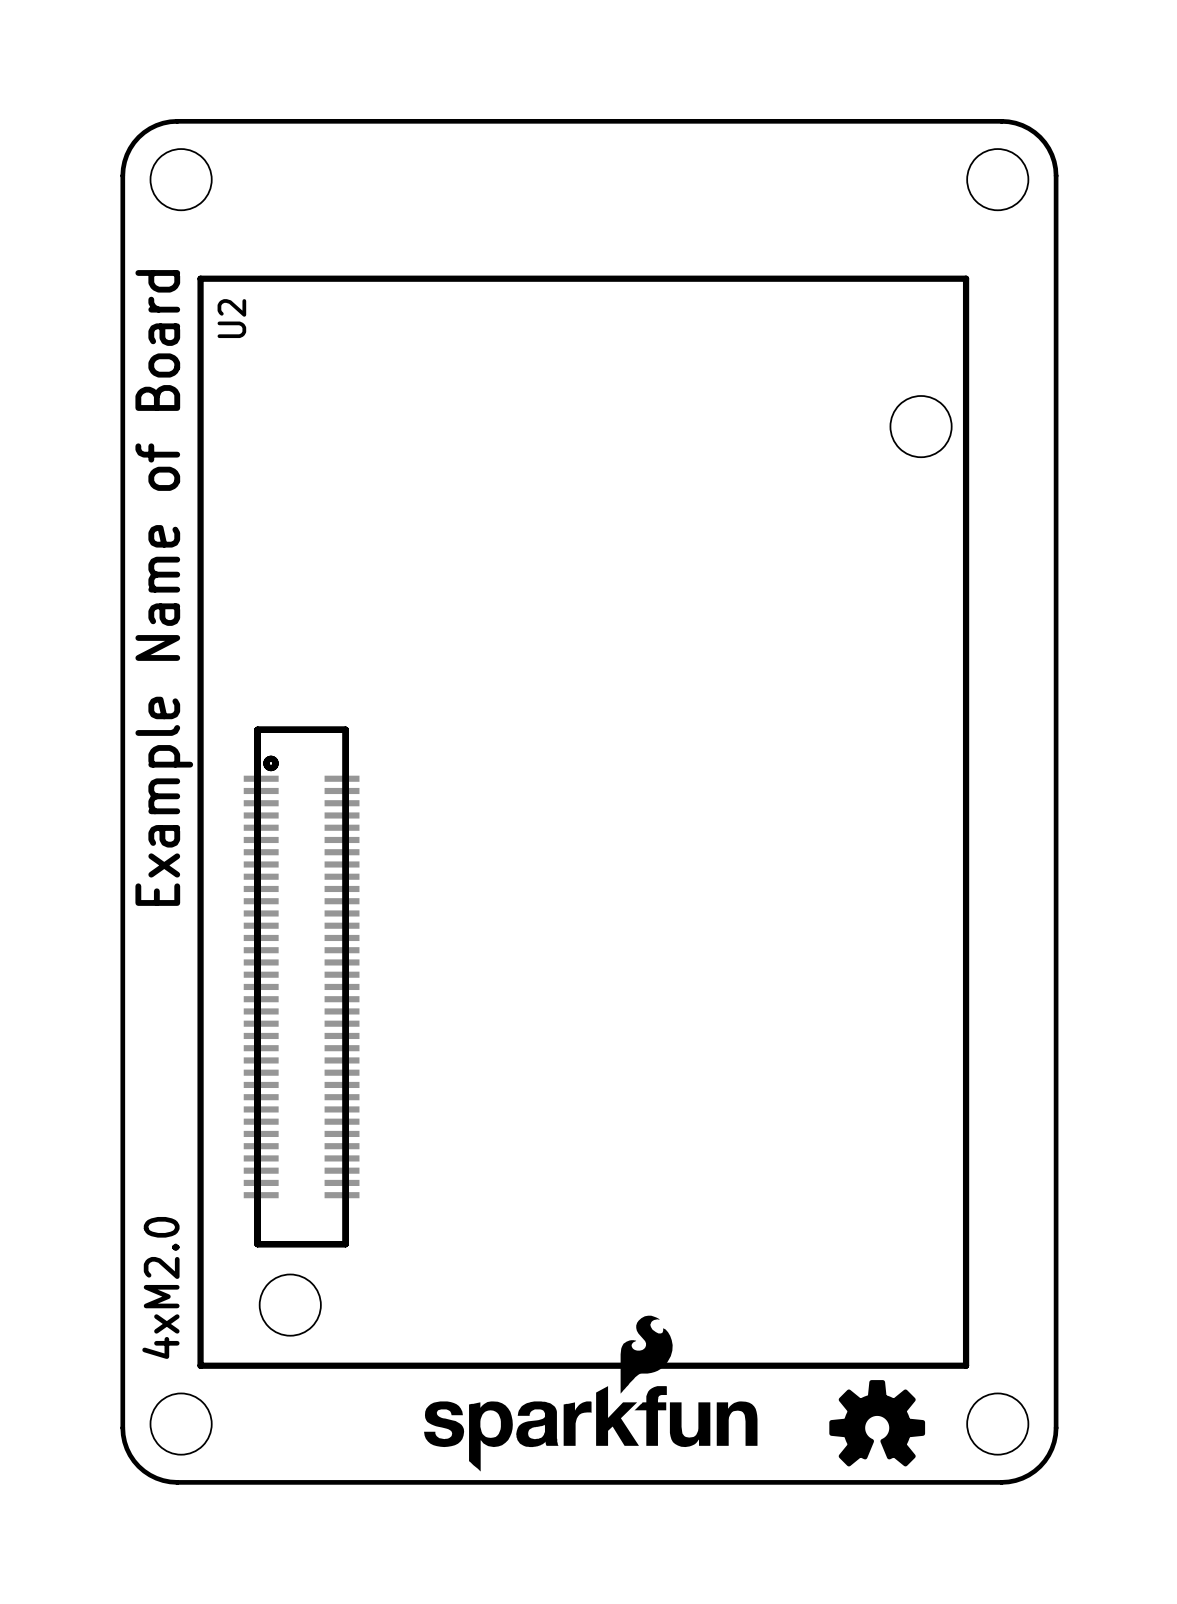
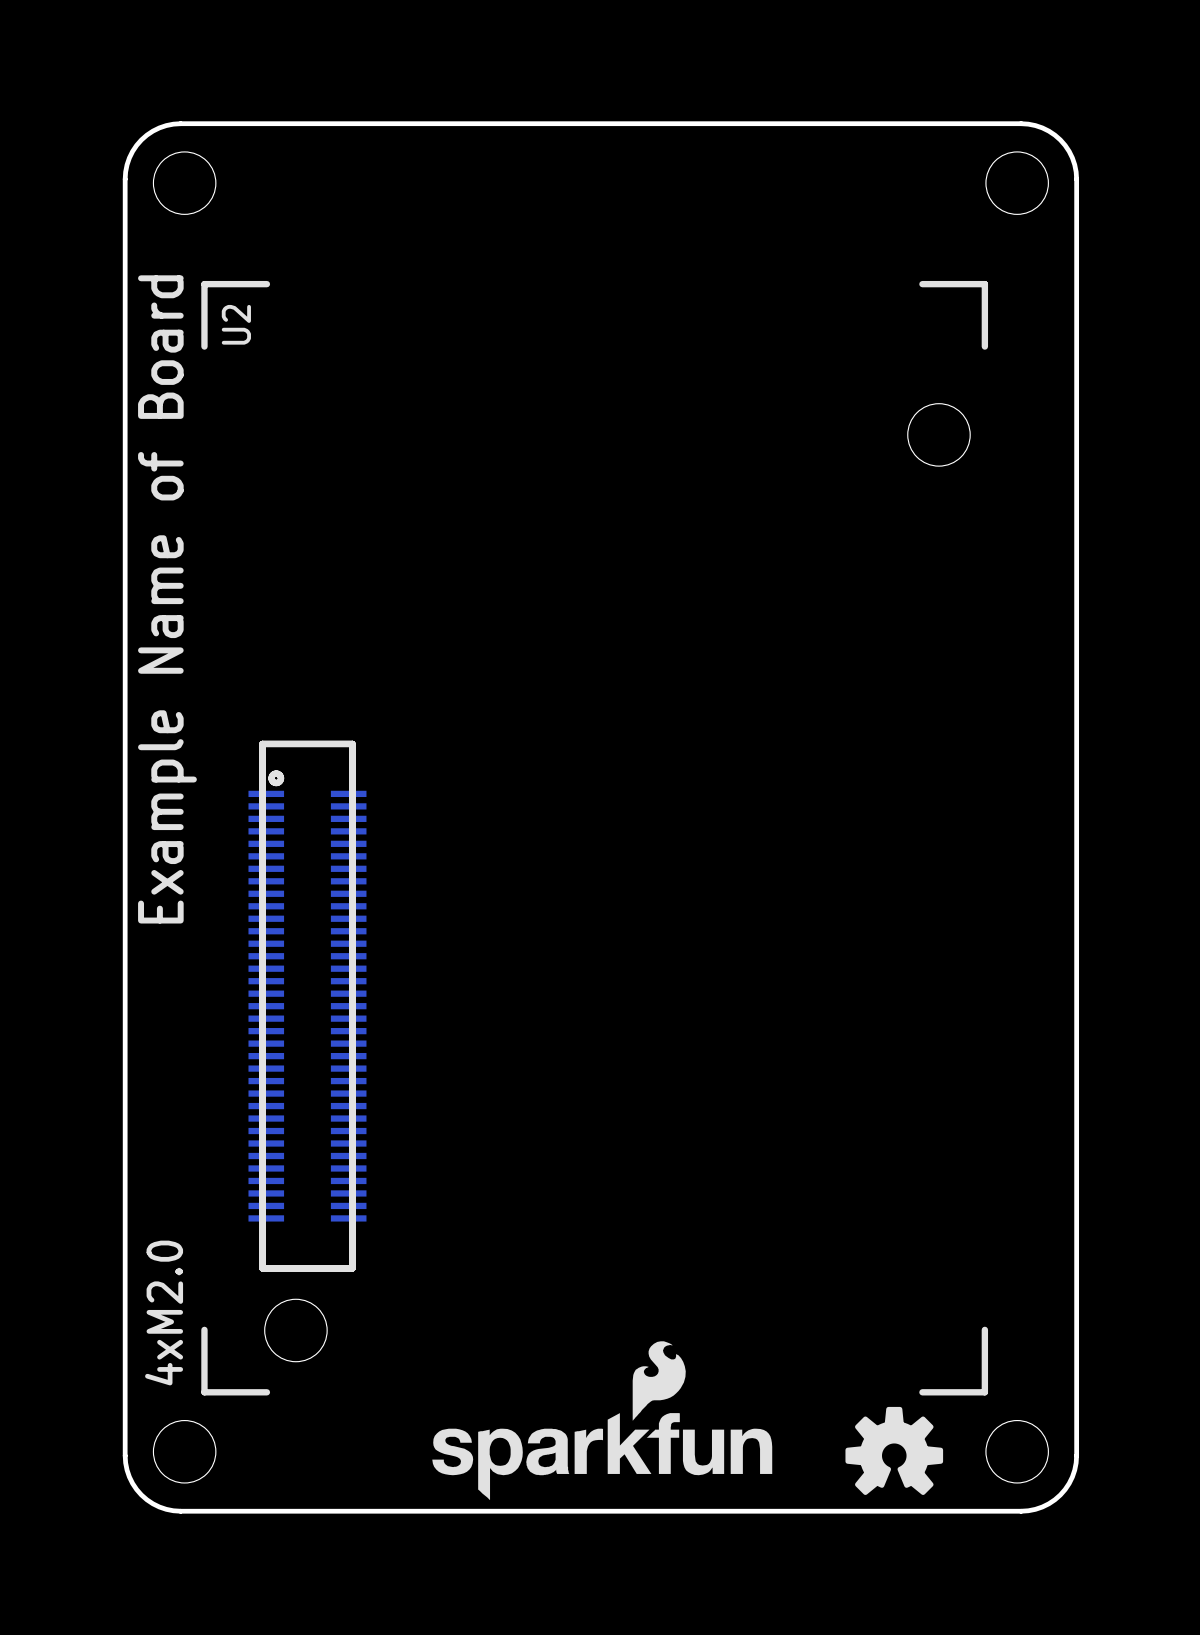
U2 footprint: [197, 275, 970, 1369] -> [201, 280, 989, 1396]

